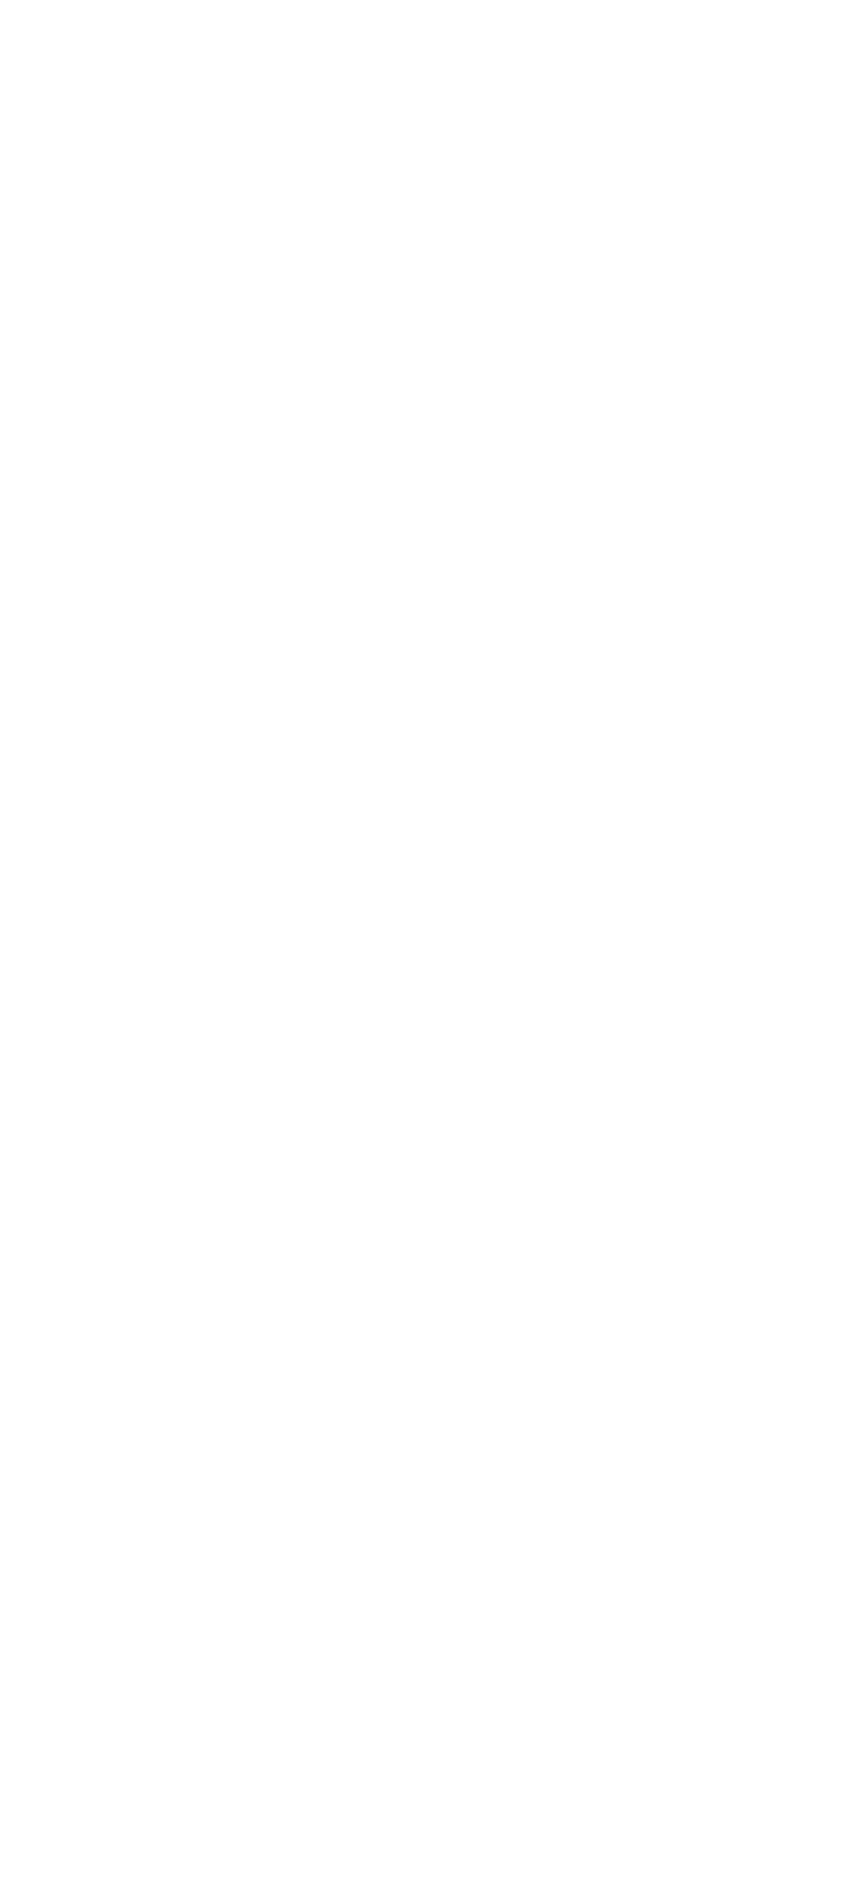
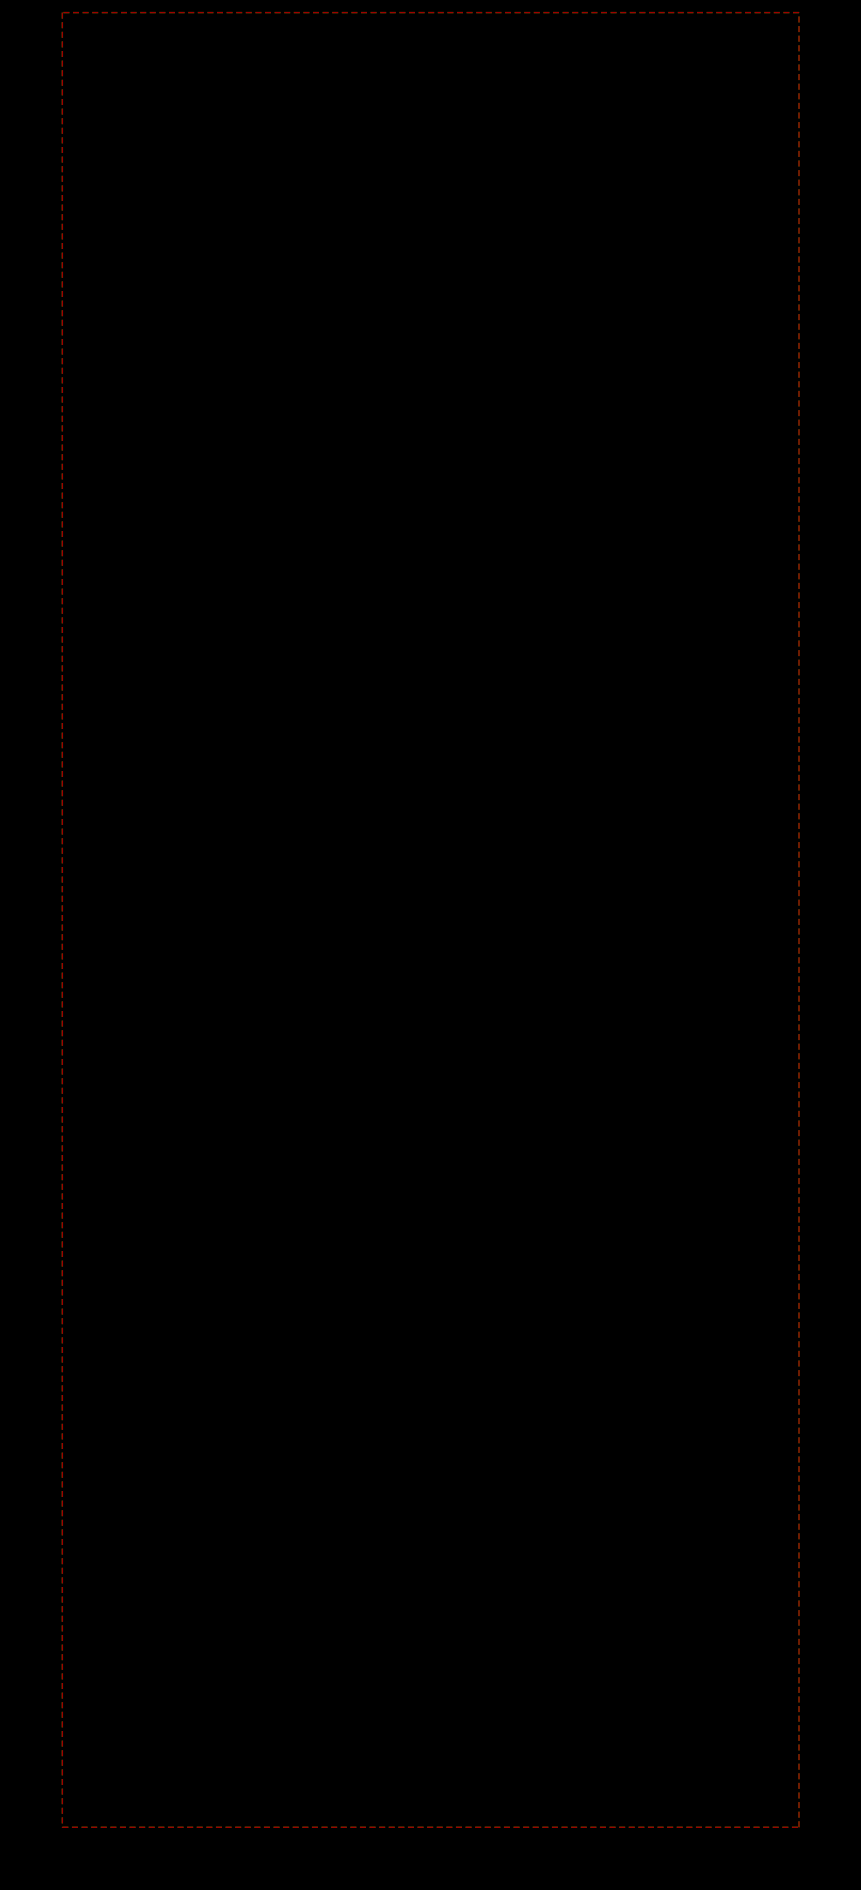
top zone outline: none -> (62, 12) (799, 12) (799, 1827) (62, 1827) (62, 12)

